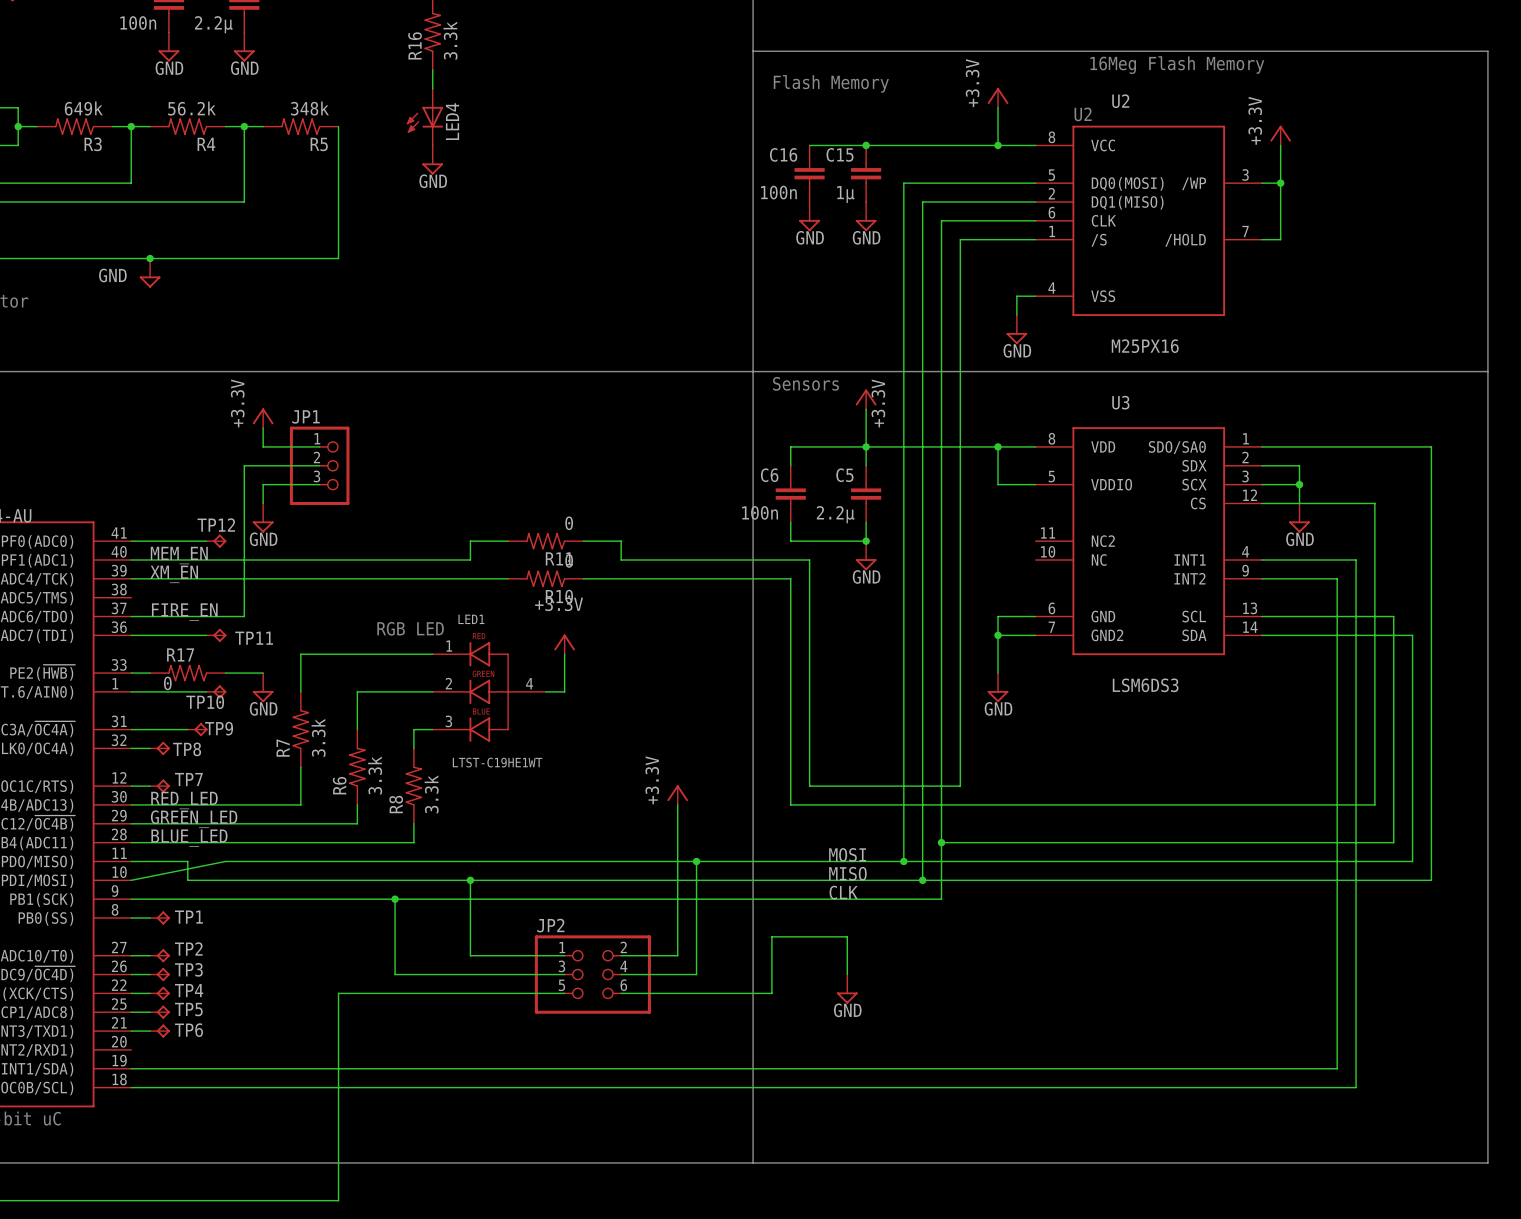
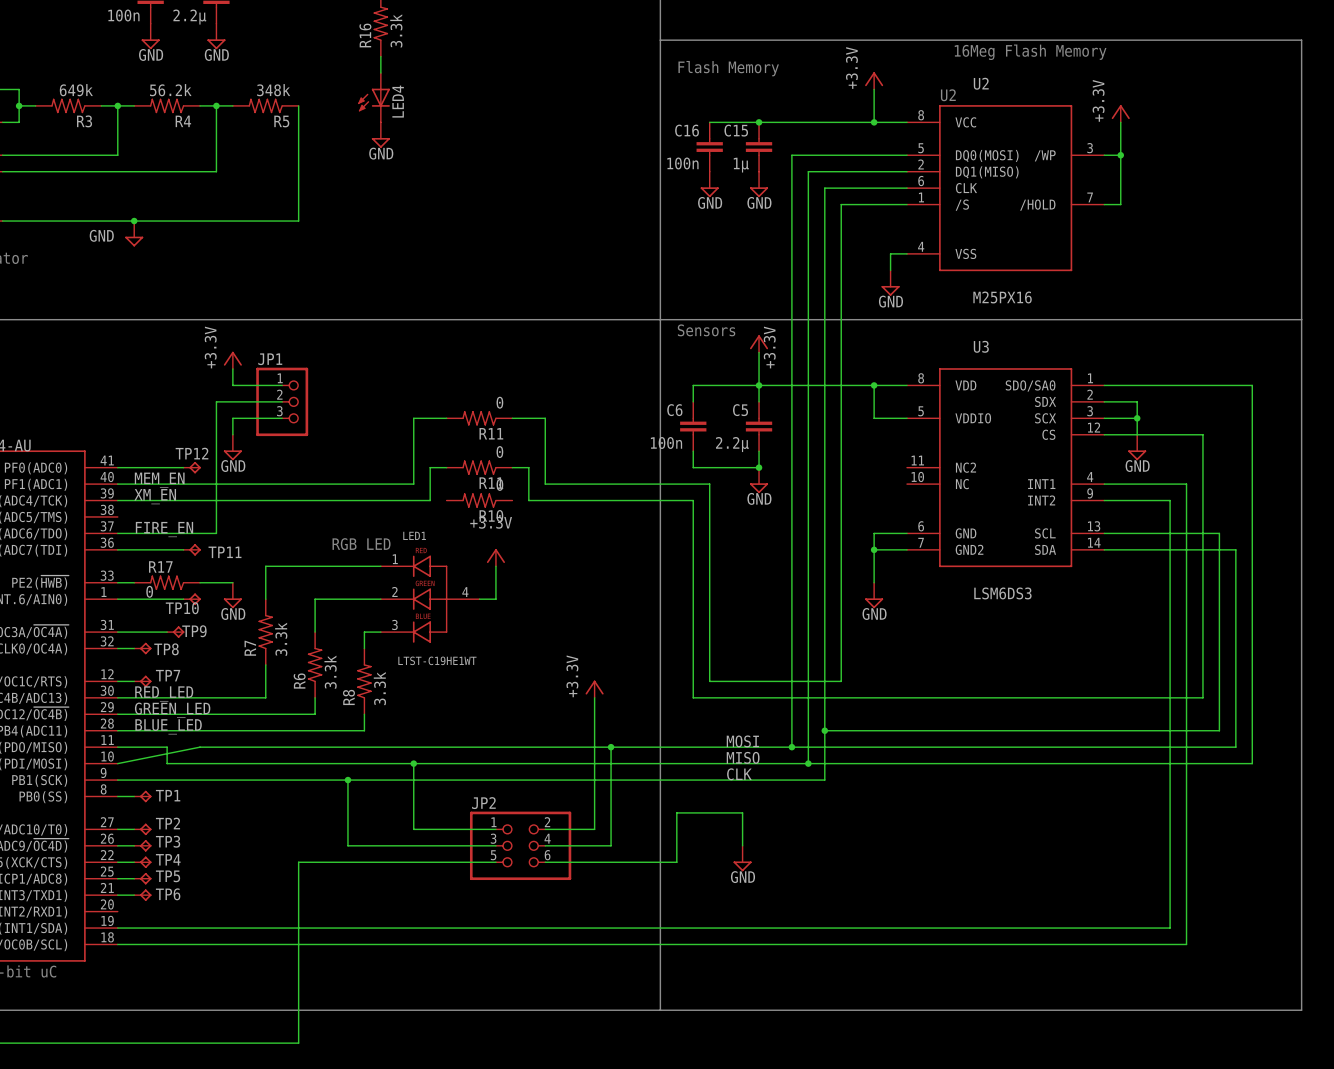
R11: none -> 0 (479, 418)
wire: (470, 541) (489, 541) -> (413, 467) (413, 418) (446, 418)
wire: (602, 541) (621, 541) -> (512, 418) (545, 418) (545, 467)
wire: (489, 578) (508, 578) -> (430, 500) (430, 467)
wire: (583, 578) (602, 578) -> (528, 467) (528, 500)

